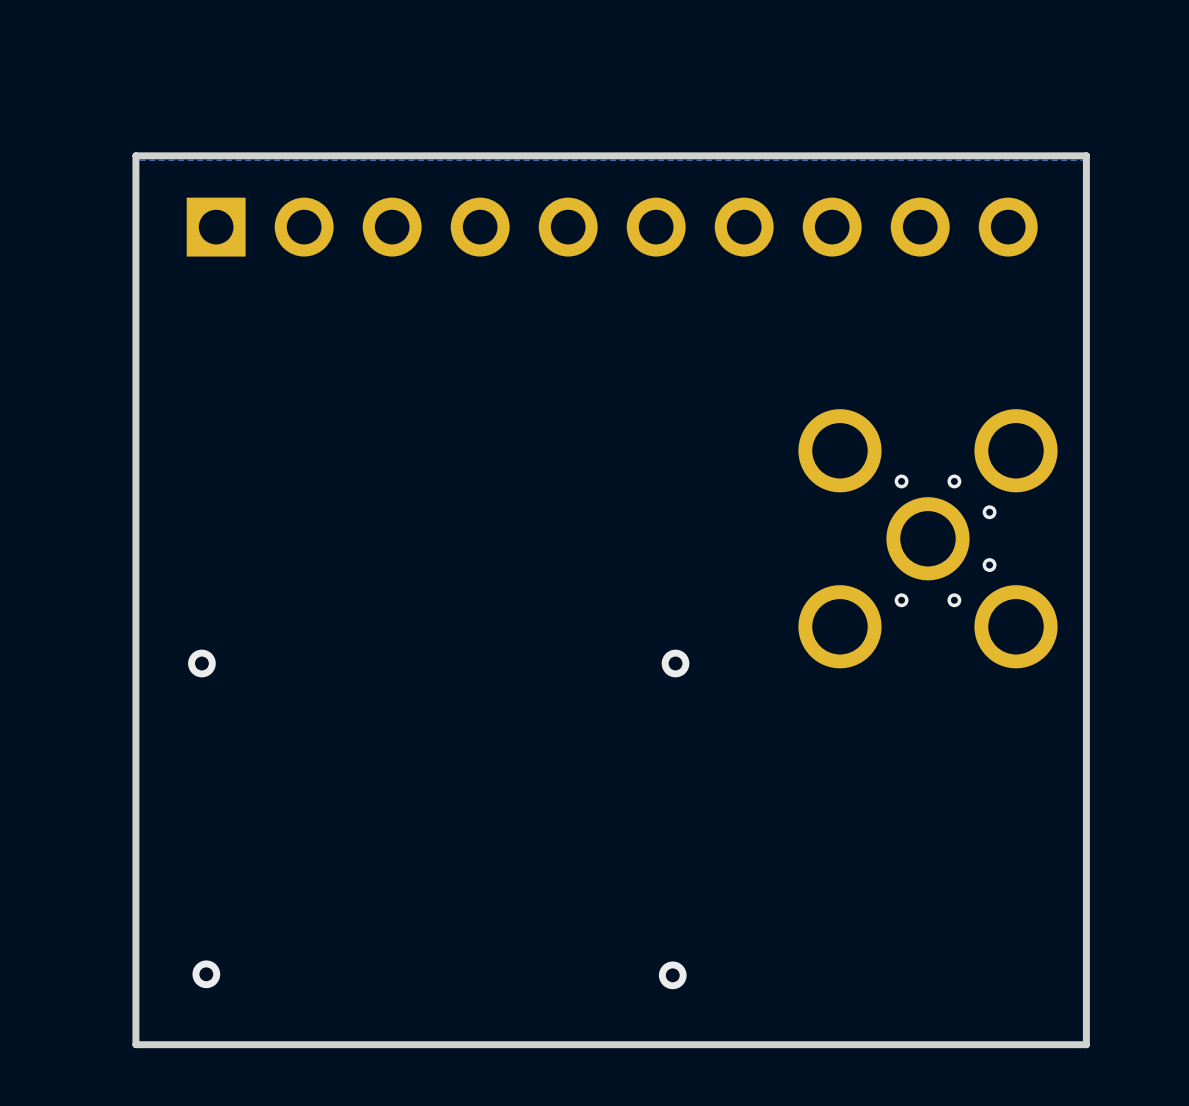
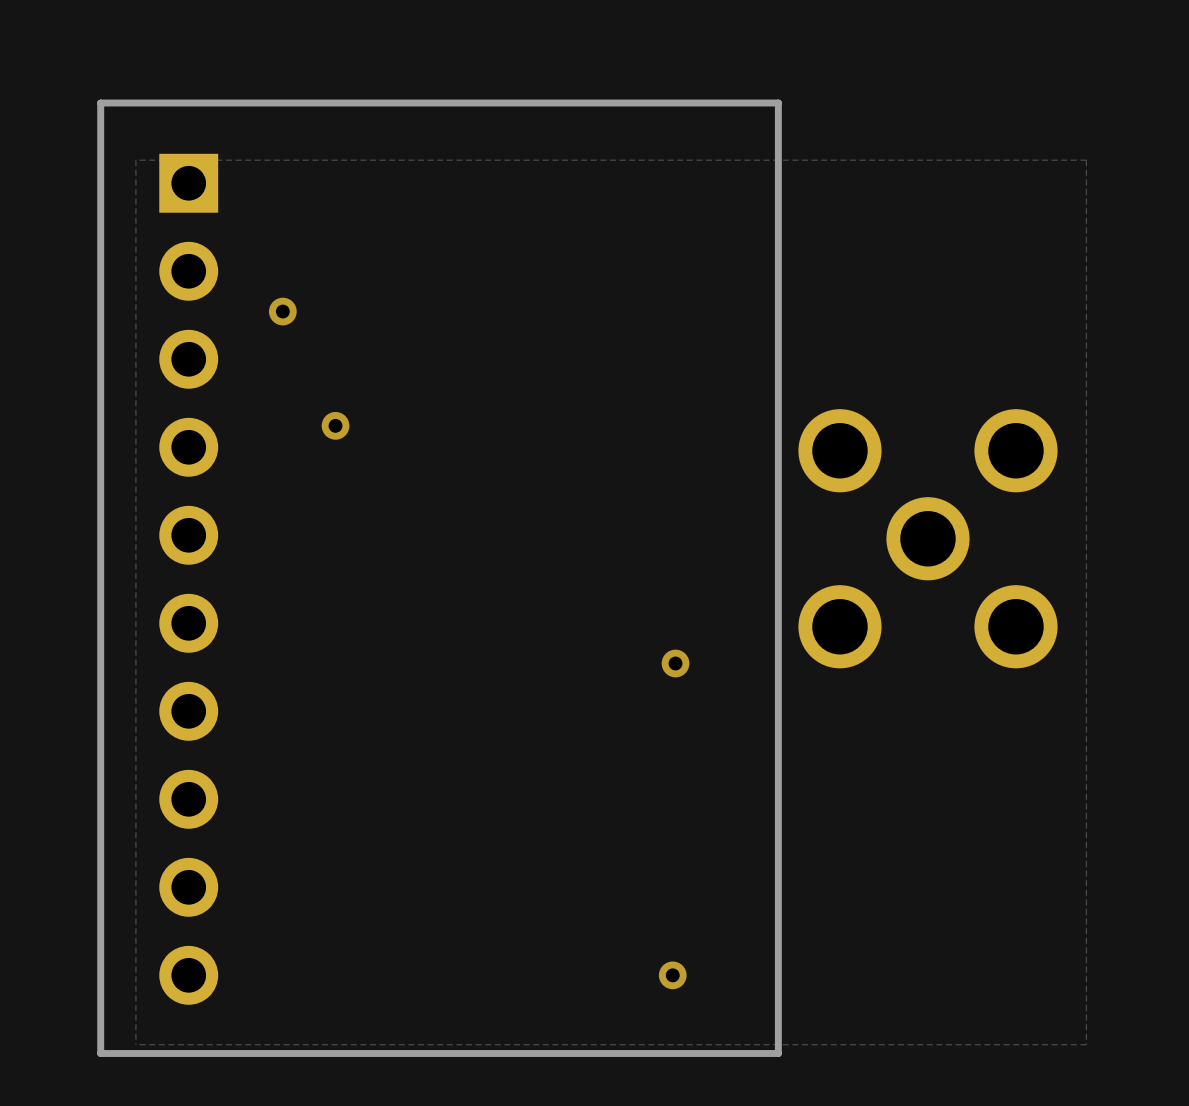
board edge: (1086, 155) (1086, 1044) (135, 1044) (135, 155) (1086, 155) -> (778, 103) (778, 1053) (100, 1053) (100, 103) (778, 103)
part rotation: 0° (612, 227) -> 90° clockwise (188, 579)
part position: (612, 227) -> (188, 579)
via: none -> (282, 311)
via: none -> (335, 425)
via: (901, 481) -> none
via: (954, 481) -> none
via: (989, 512) -> none
via: (989, 565) -> none
via: (901, 600) -> none
via: (954, 600) -> none
via: (201, 663) -> none
via: (206, 974) -> none

